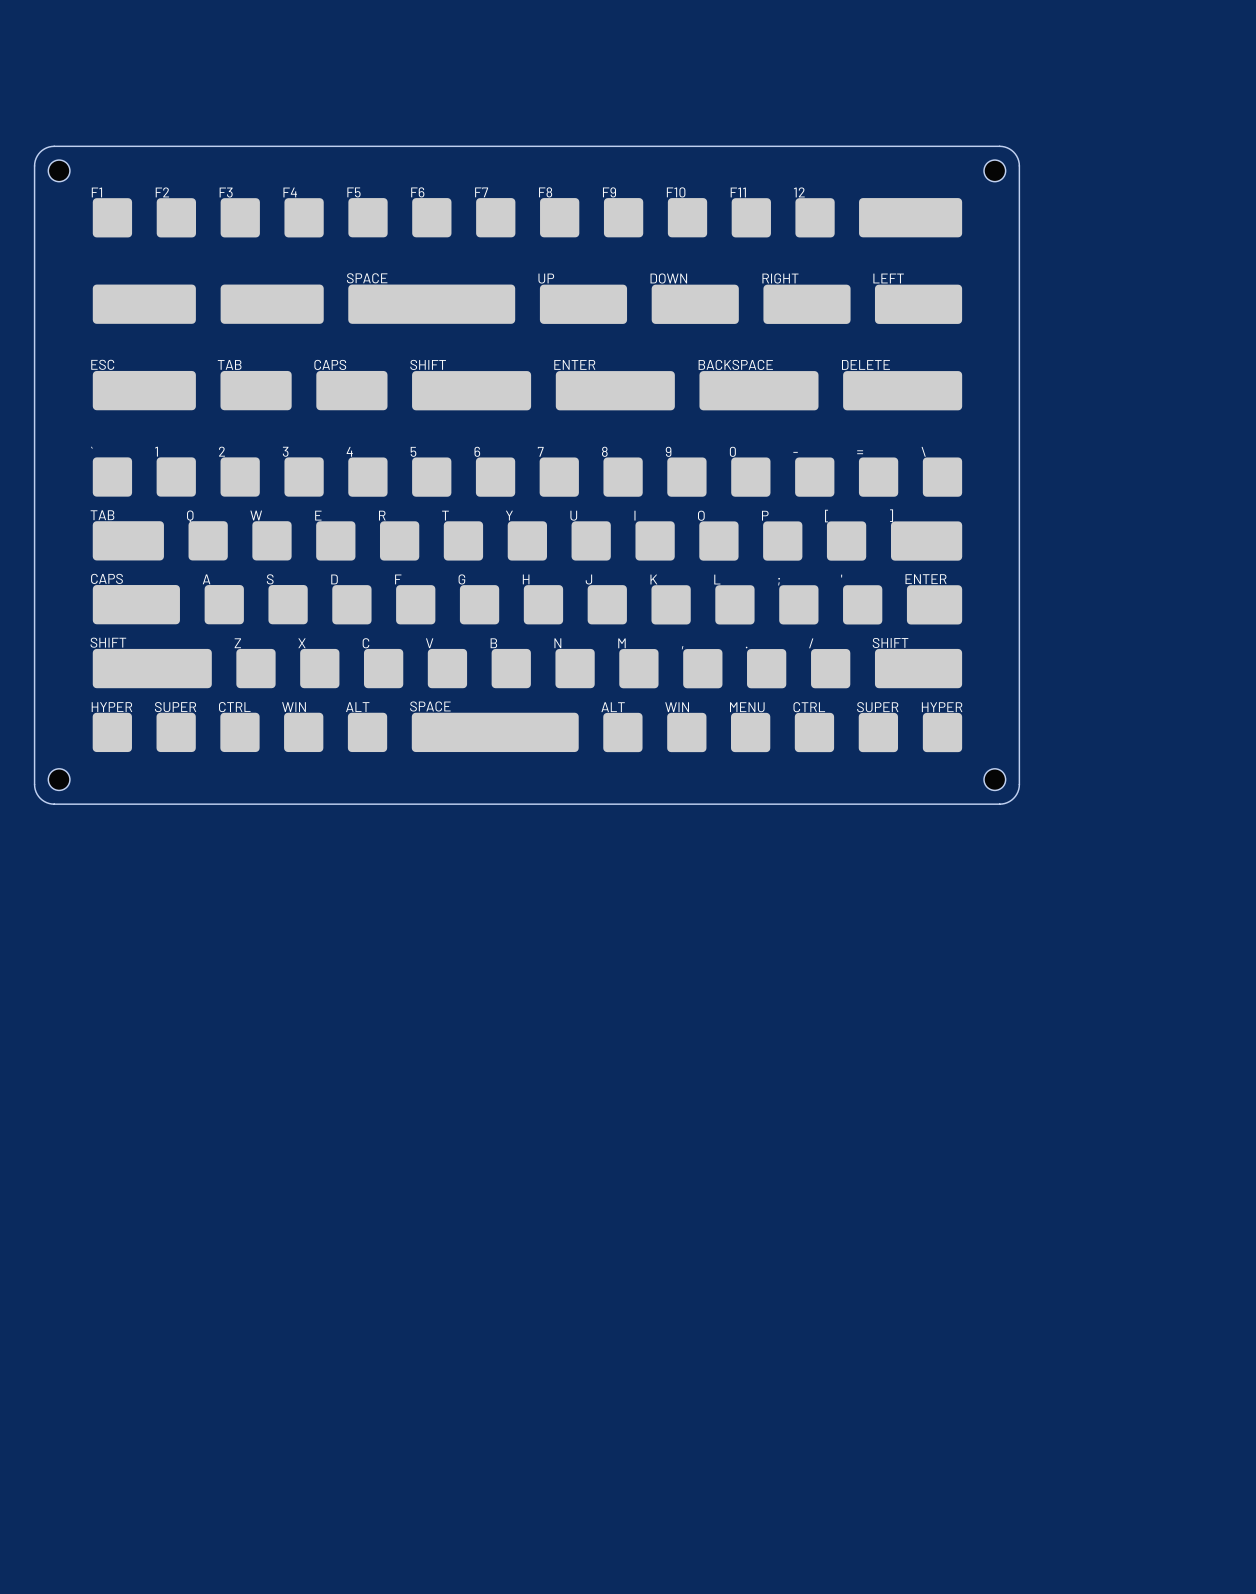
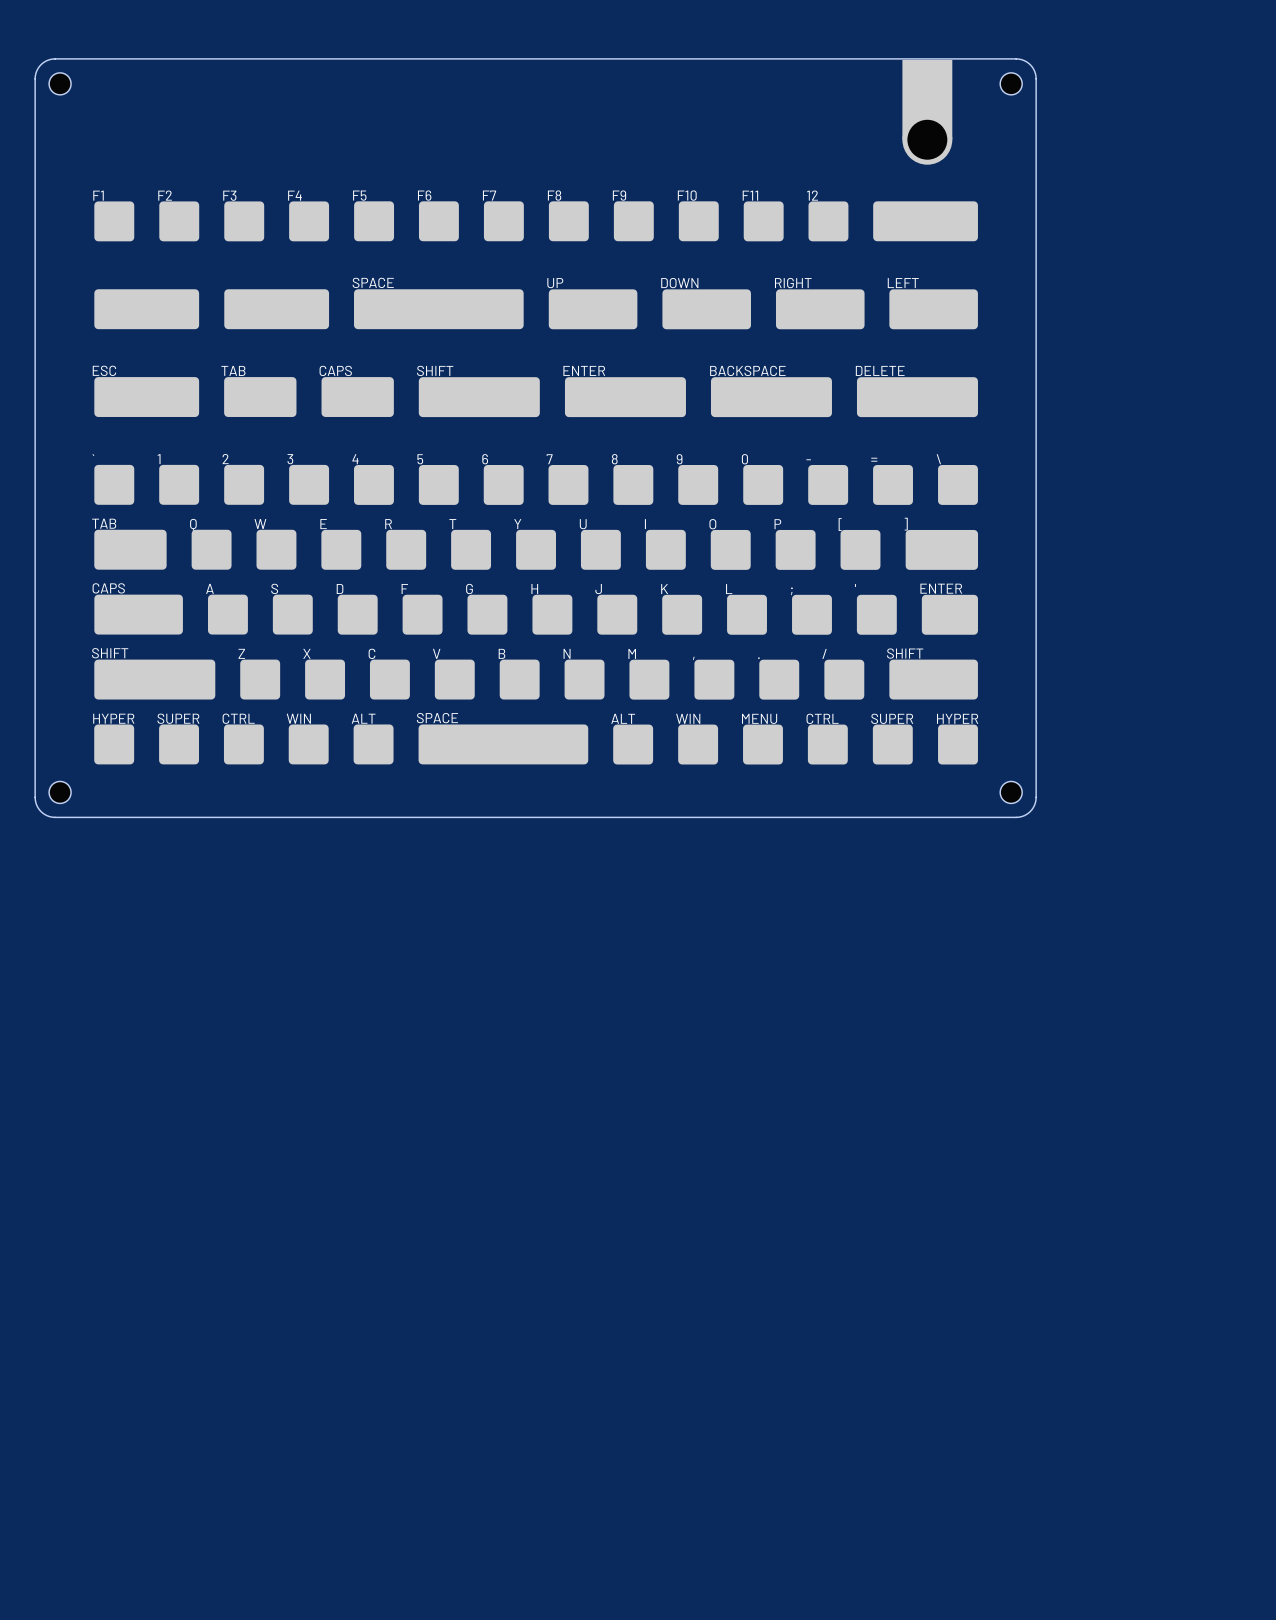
part: none -> (927, 112)
board edge: (34, 165) (40, 152) (54, 146) (999, 146) (1013, 152) (1019, 165) -> (35, 168) (35, 76) (37, 68) (42, 63) (55, 58) (1018, 59) (1030, 64) (1035, 76) (1036, 168)
part position: (59, 170) -> (60, 83)
part position: (994, 170) -> (1011, 83)

